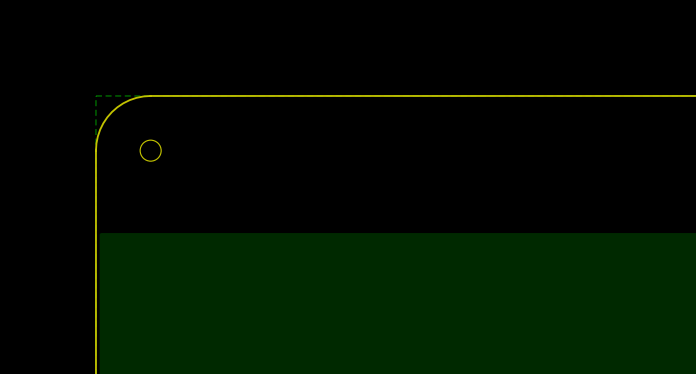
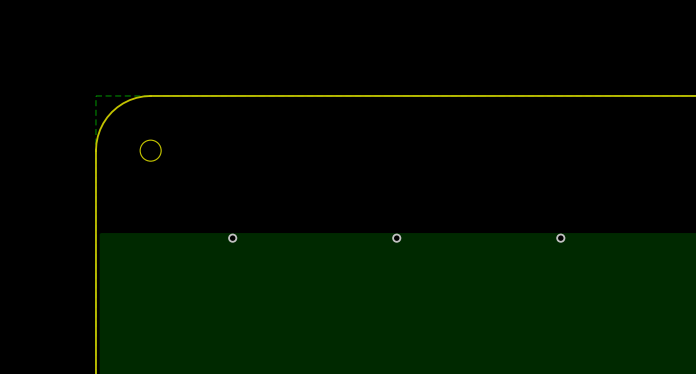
via: none -> (232, 238)
via: none -> (396, 238)
via: none -> (560, 238)

